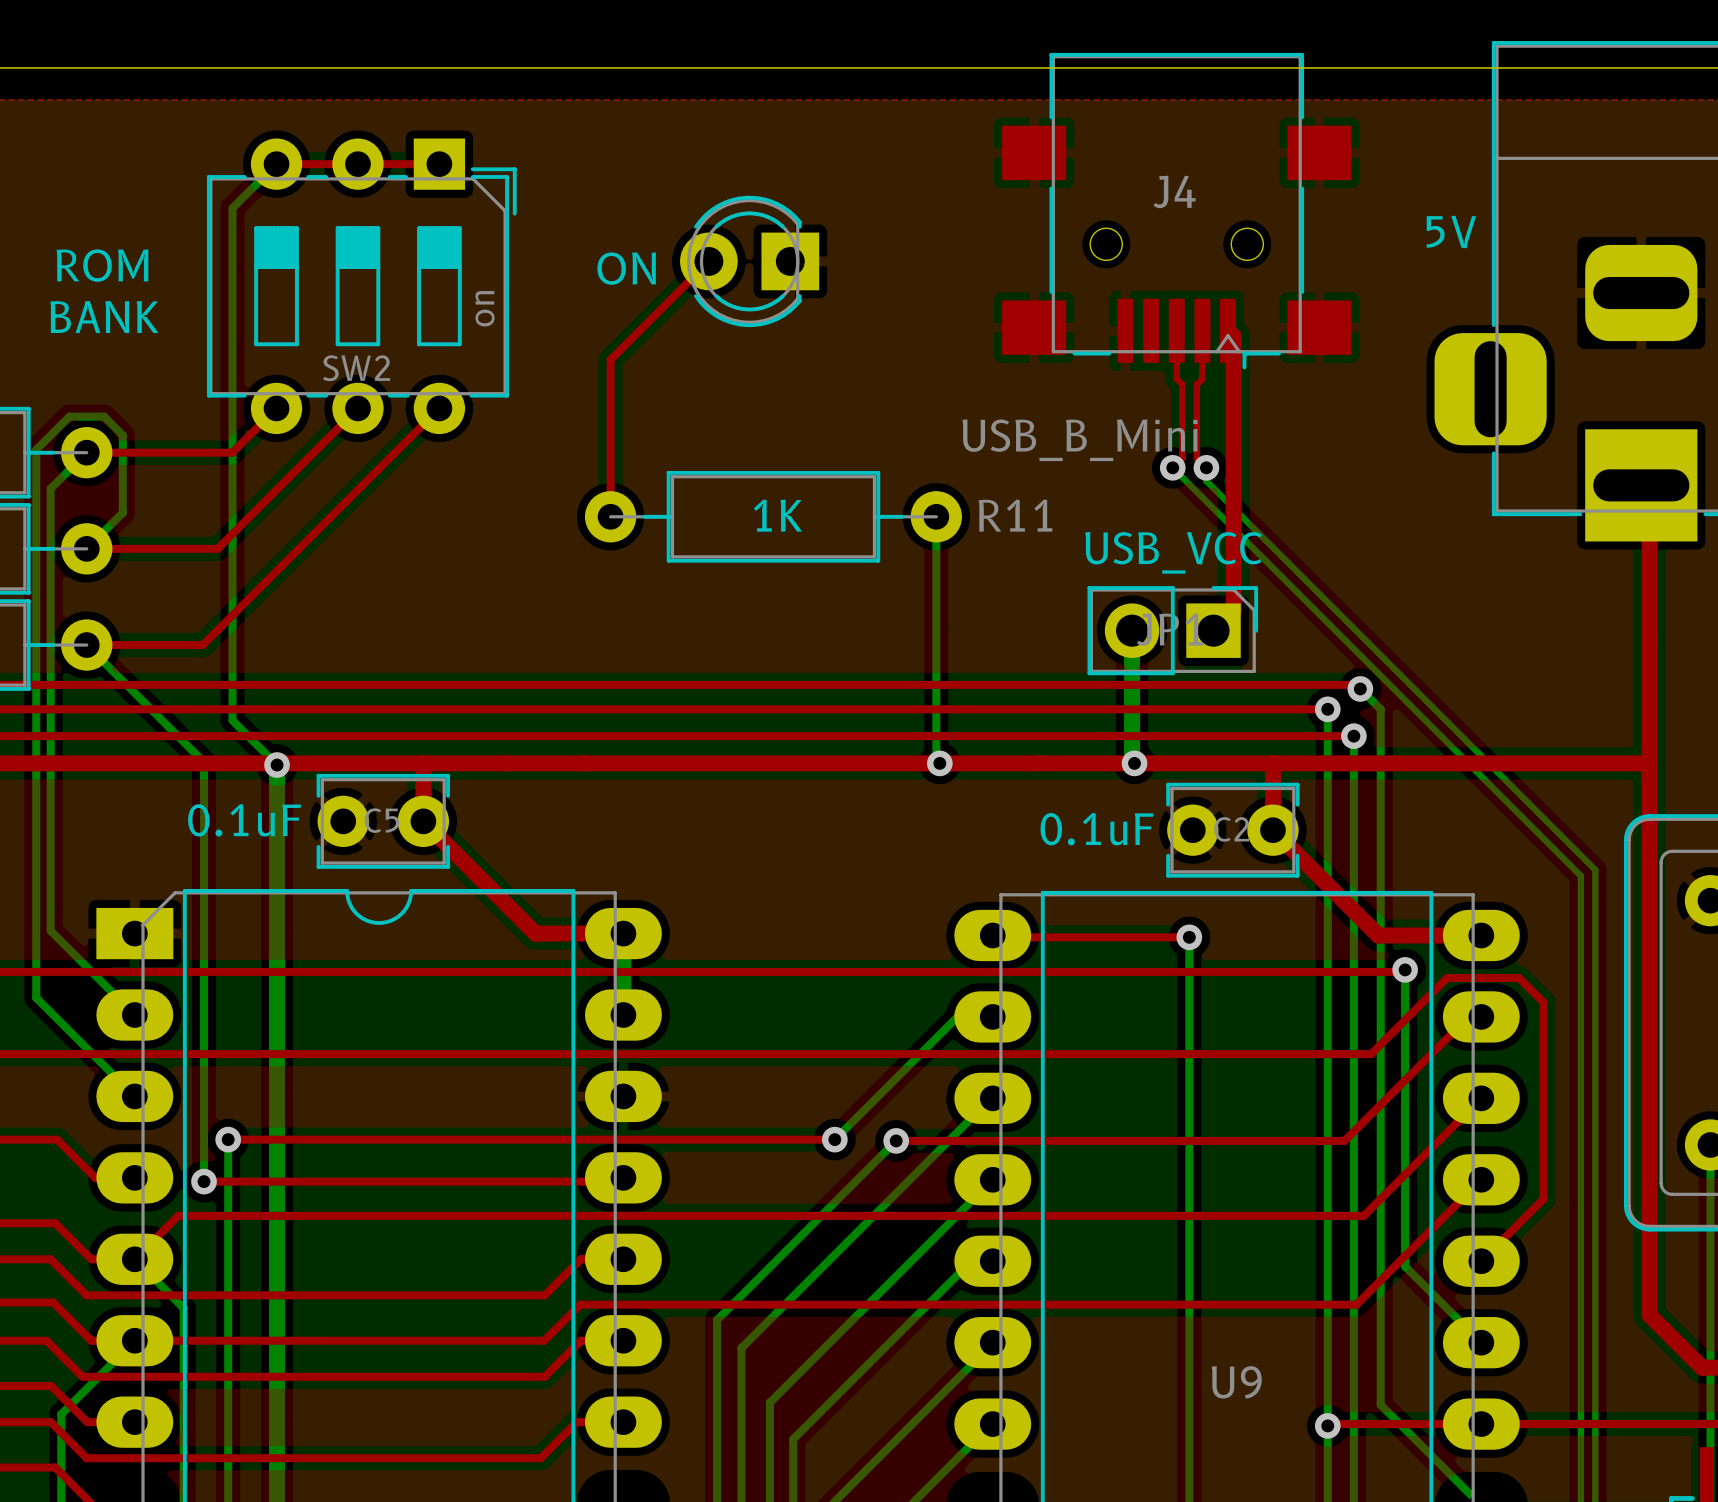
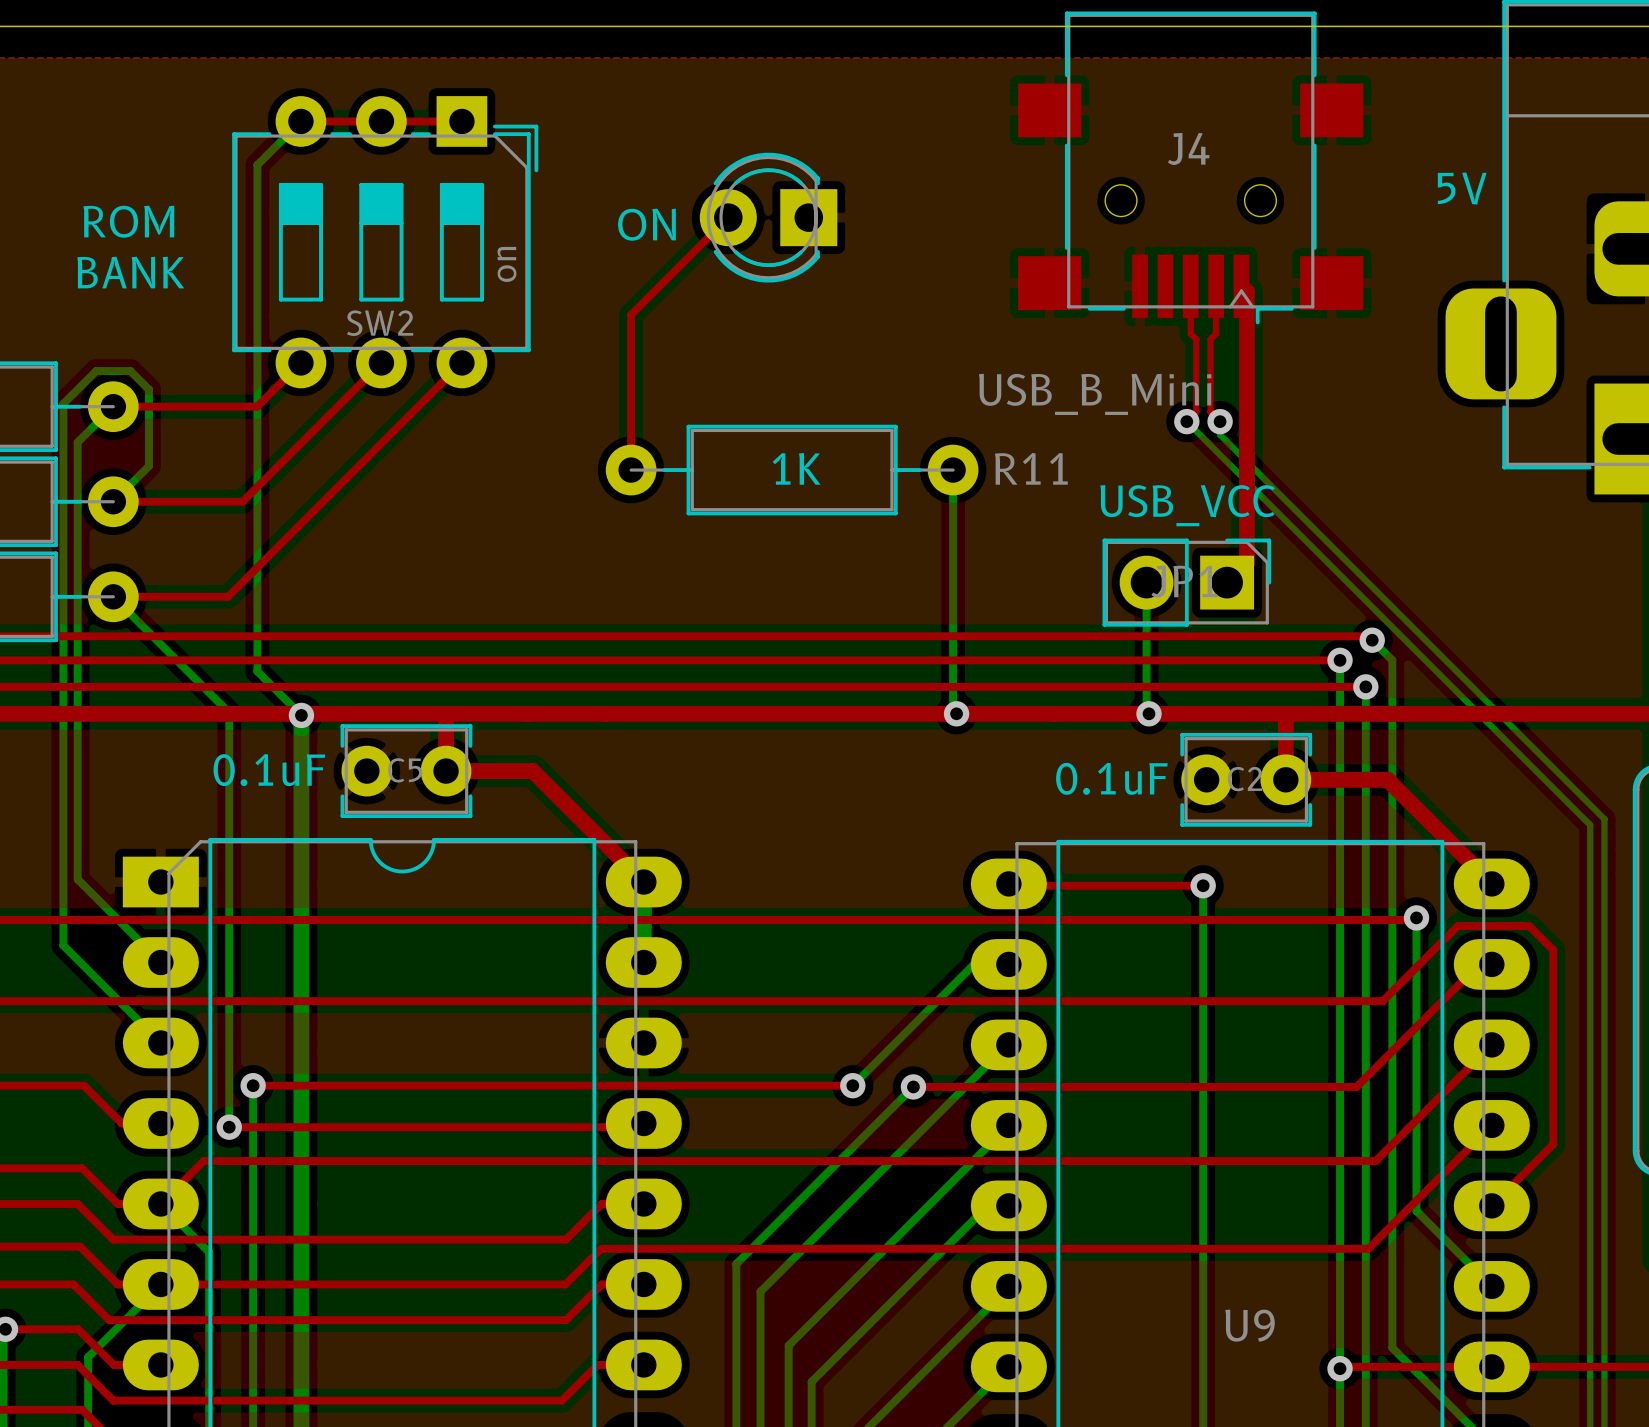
bottom track width: thick (1132, 630) (1132, 760) (1134, 763) -> thin (1146, 582) (1146, 711) (1149, 713)
top track: (423, 821) (535, 933) (623, 933) -> (446, 771) (532, 771) (643, 882)
top track: (1272, 830) (1378, 935) (1481, 935) -> (1285, 779) (1387, 779) (1491, 883)

